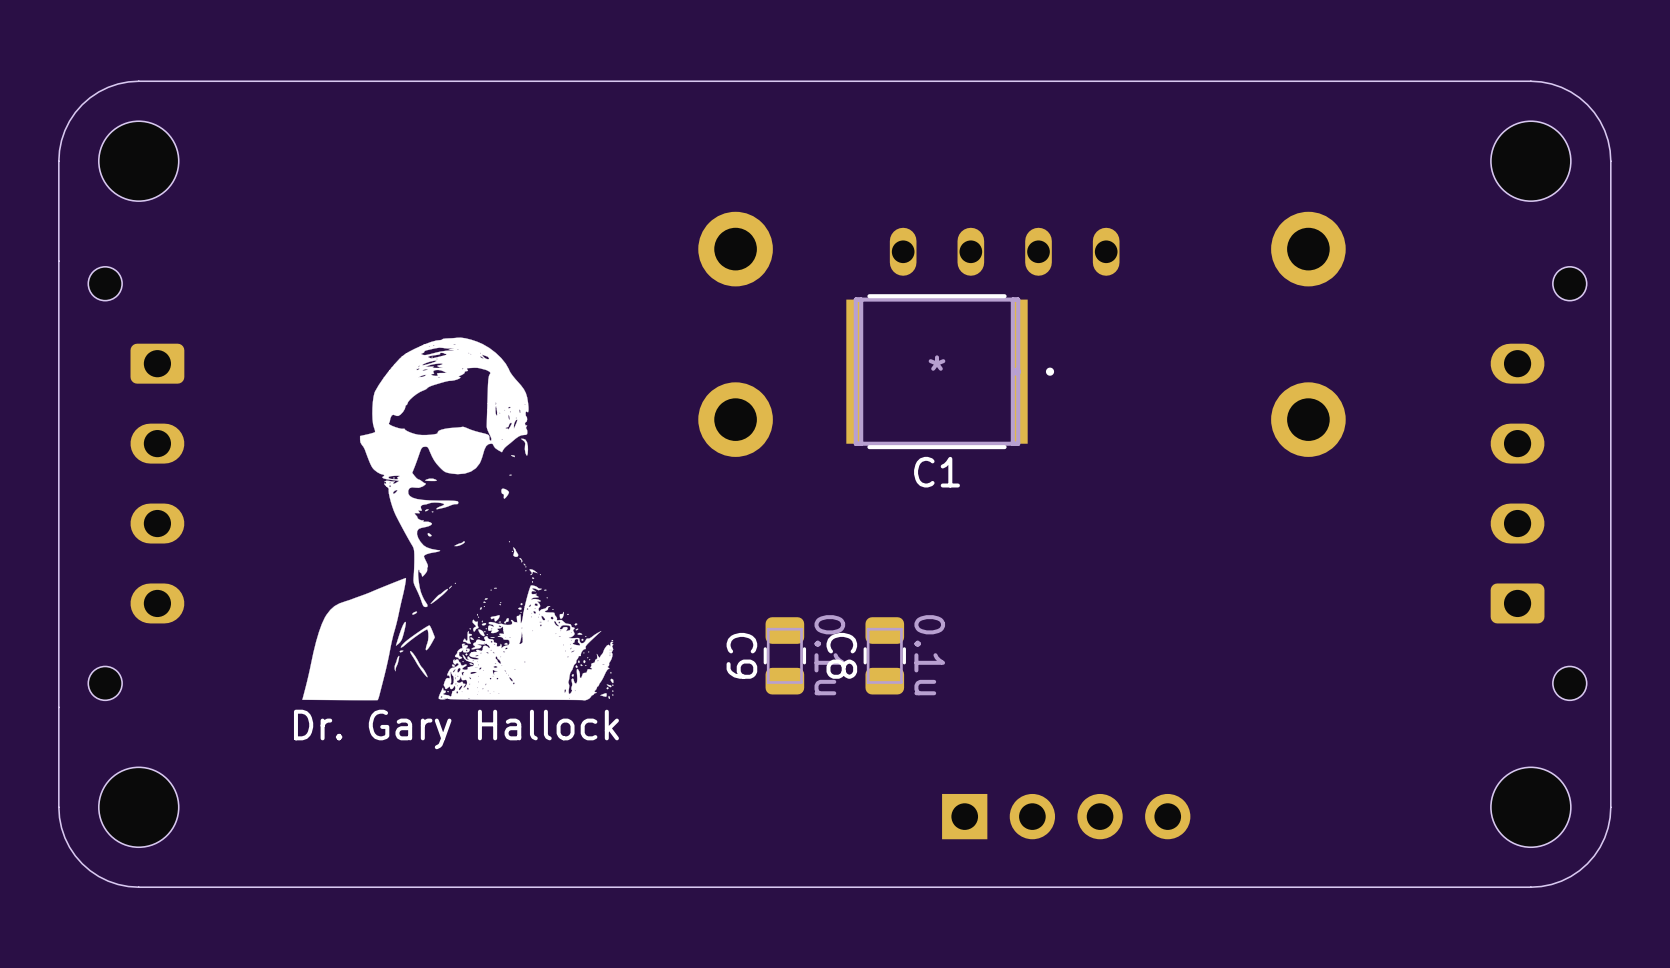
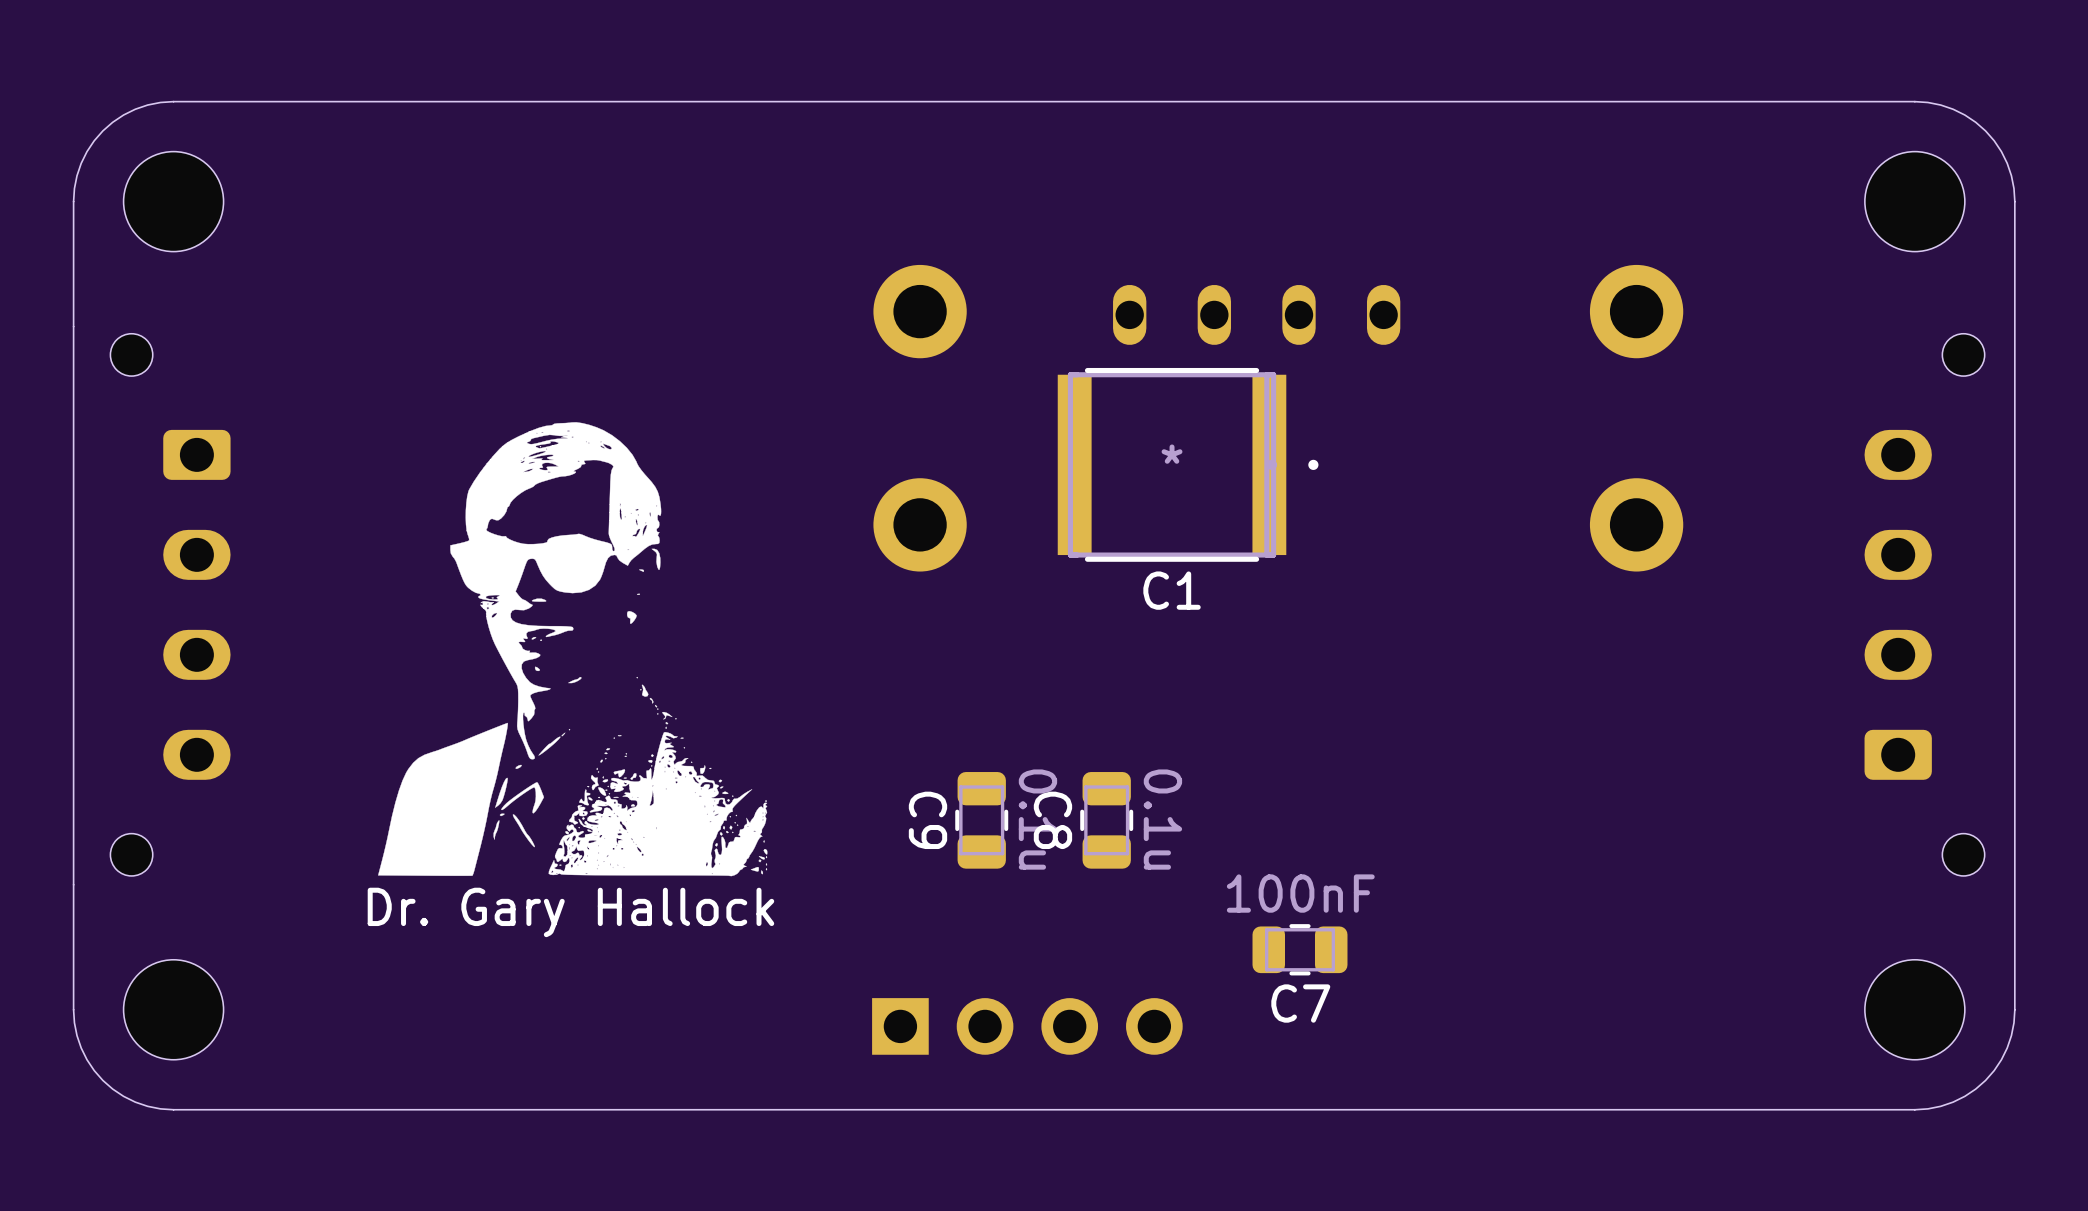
C1 footprint: [846, 294, 1055, 450] -> [1057, 367, 1319, 562]
C7: none -> 100nF (1299, 949)
part position: (1066, 816) -> (1027, 1026)

